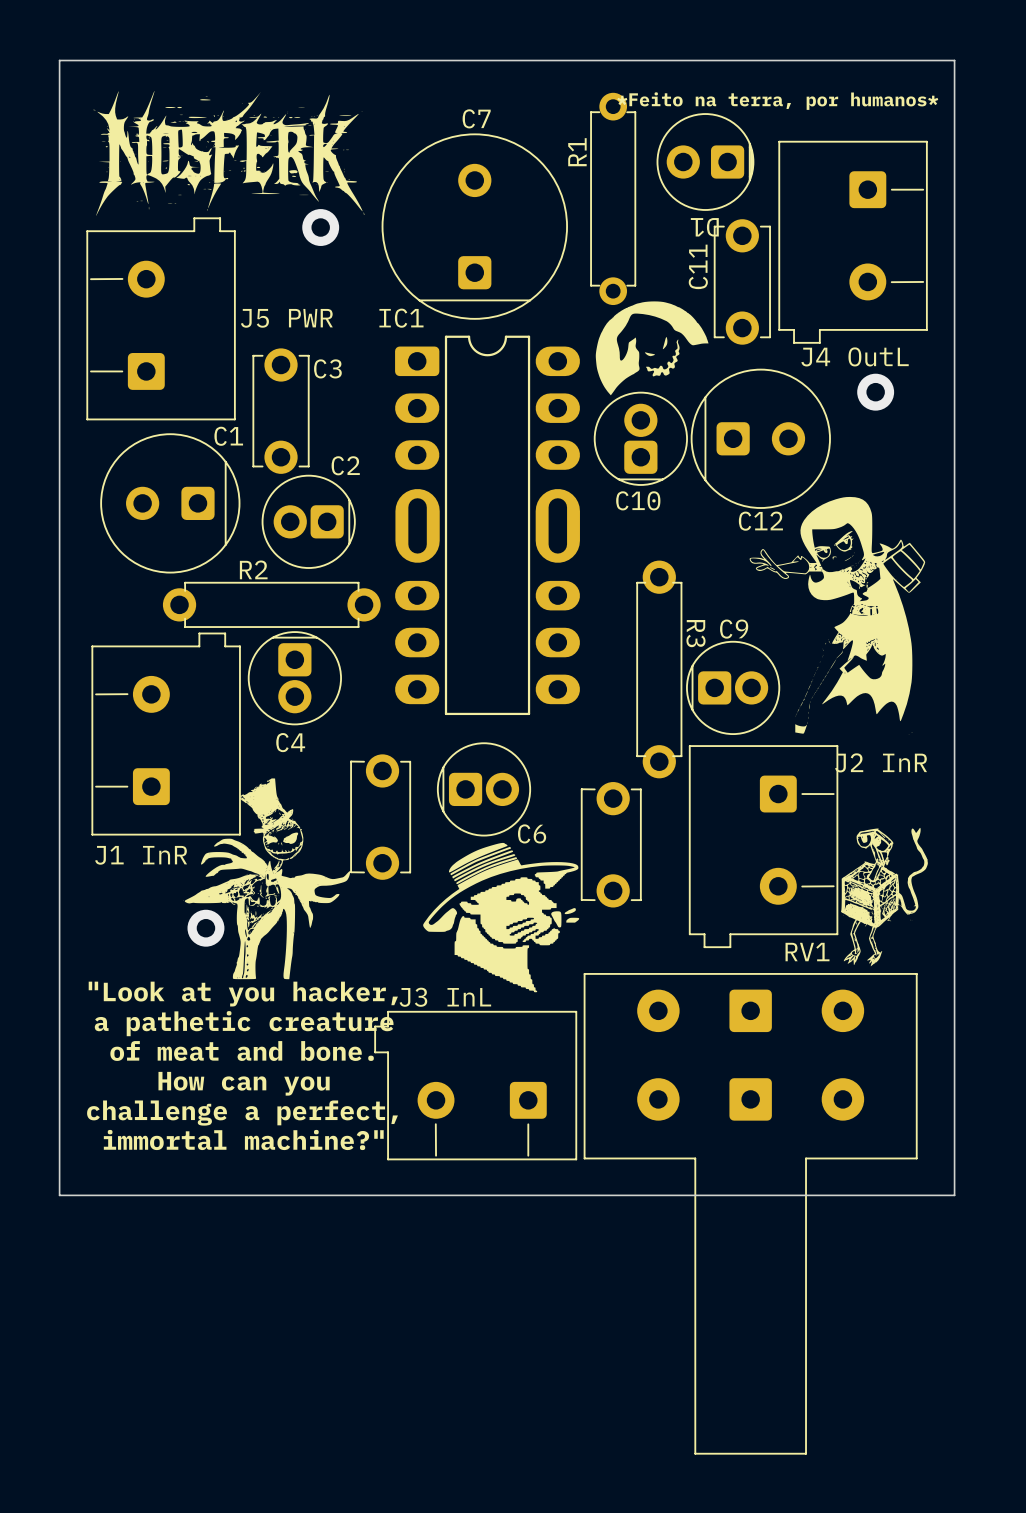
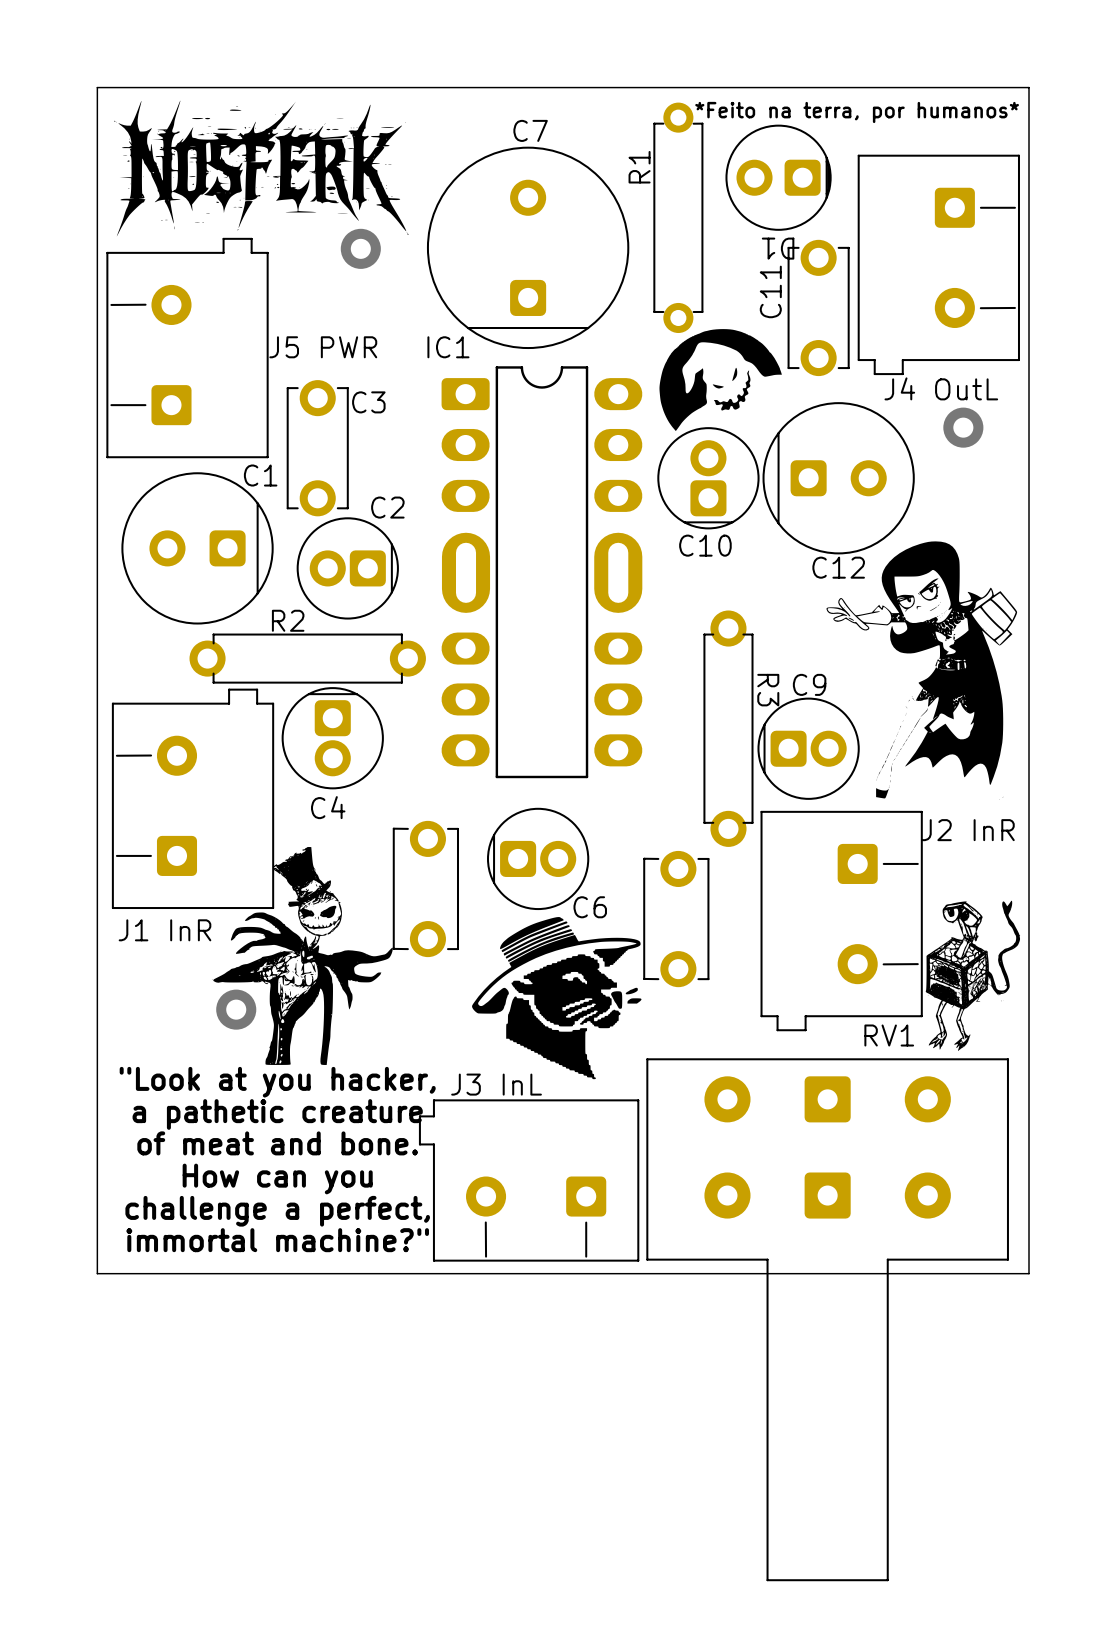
board edge: (59, 60) (954, 60) (954, 1195) (59, 1195) (59, 60) -> (97, 87) (97, 1273) (1029, 1273) (1029, 87) (97, 87)

